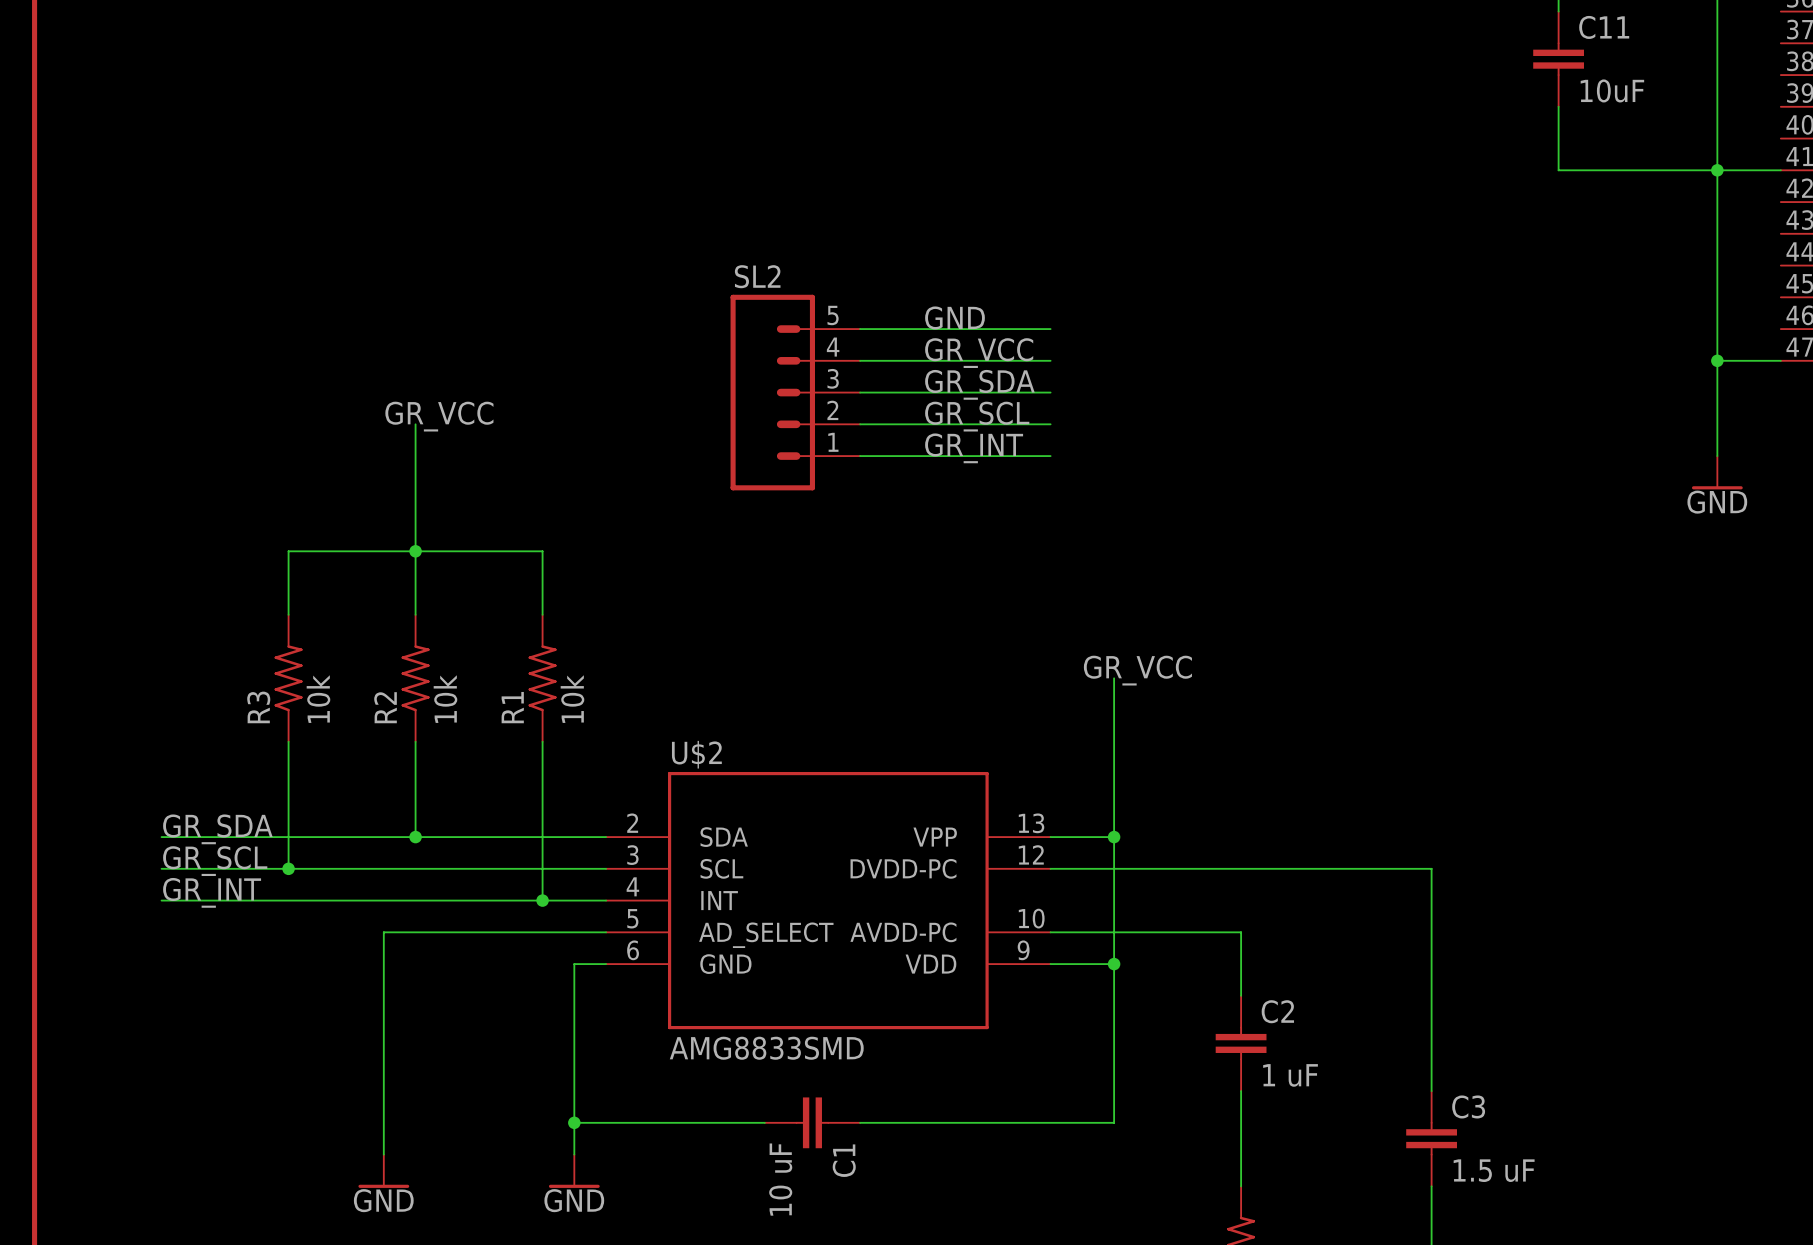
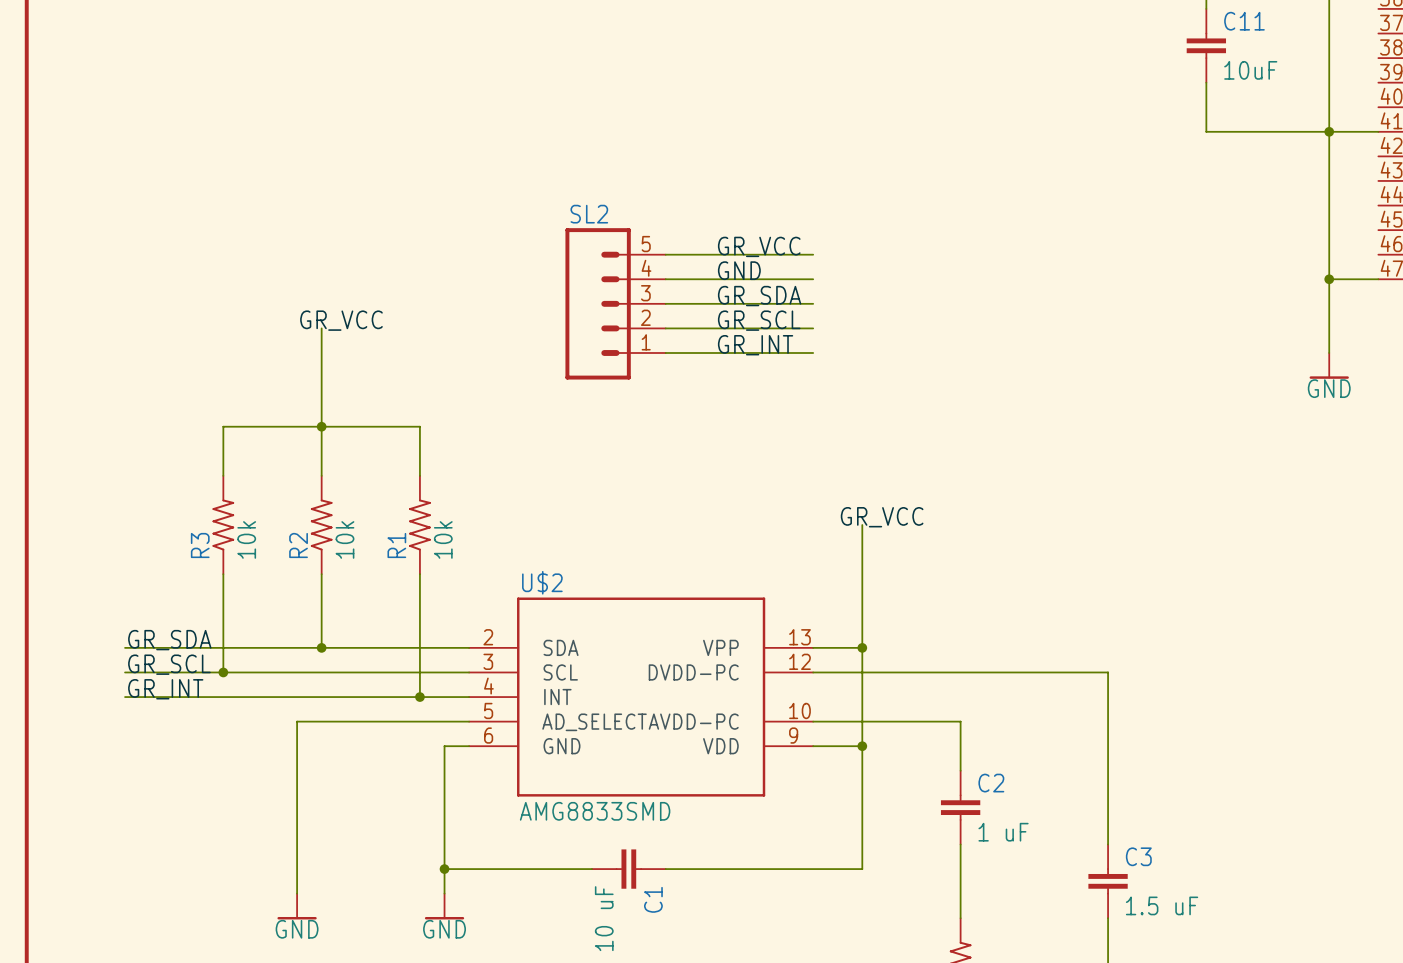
label: GND (955, 317) -> GR_VCC (759, 246)
label: GR_VCC (979, 353) -> GND (739, 270)

